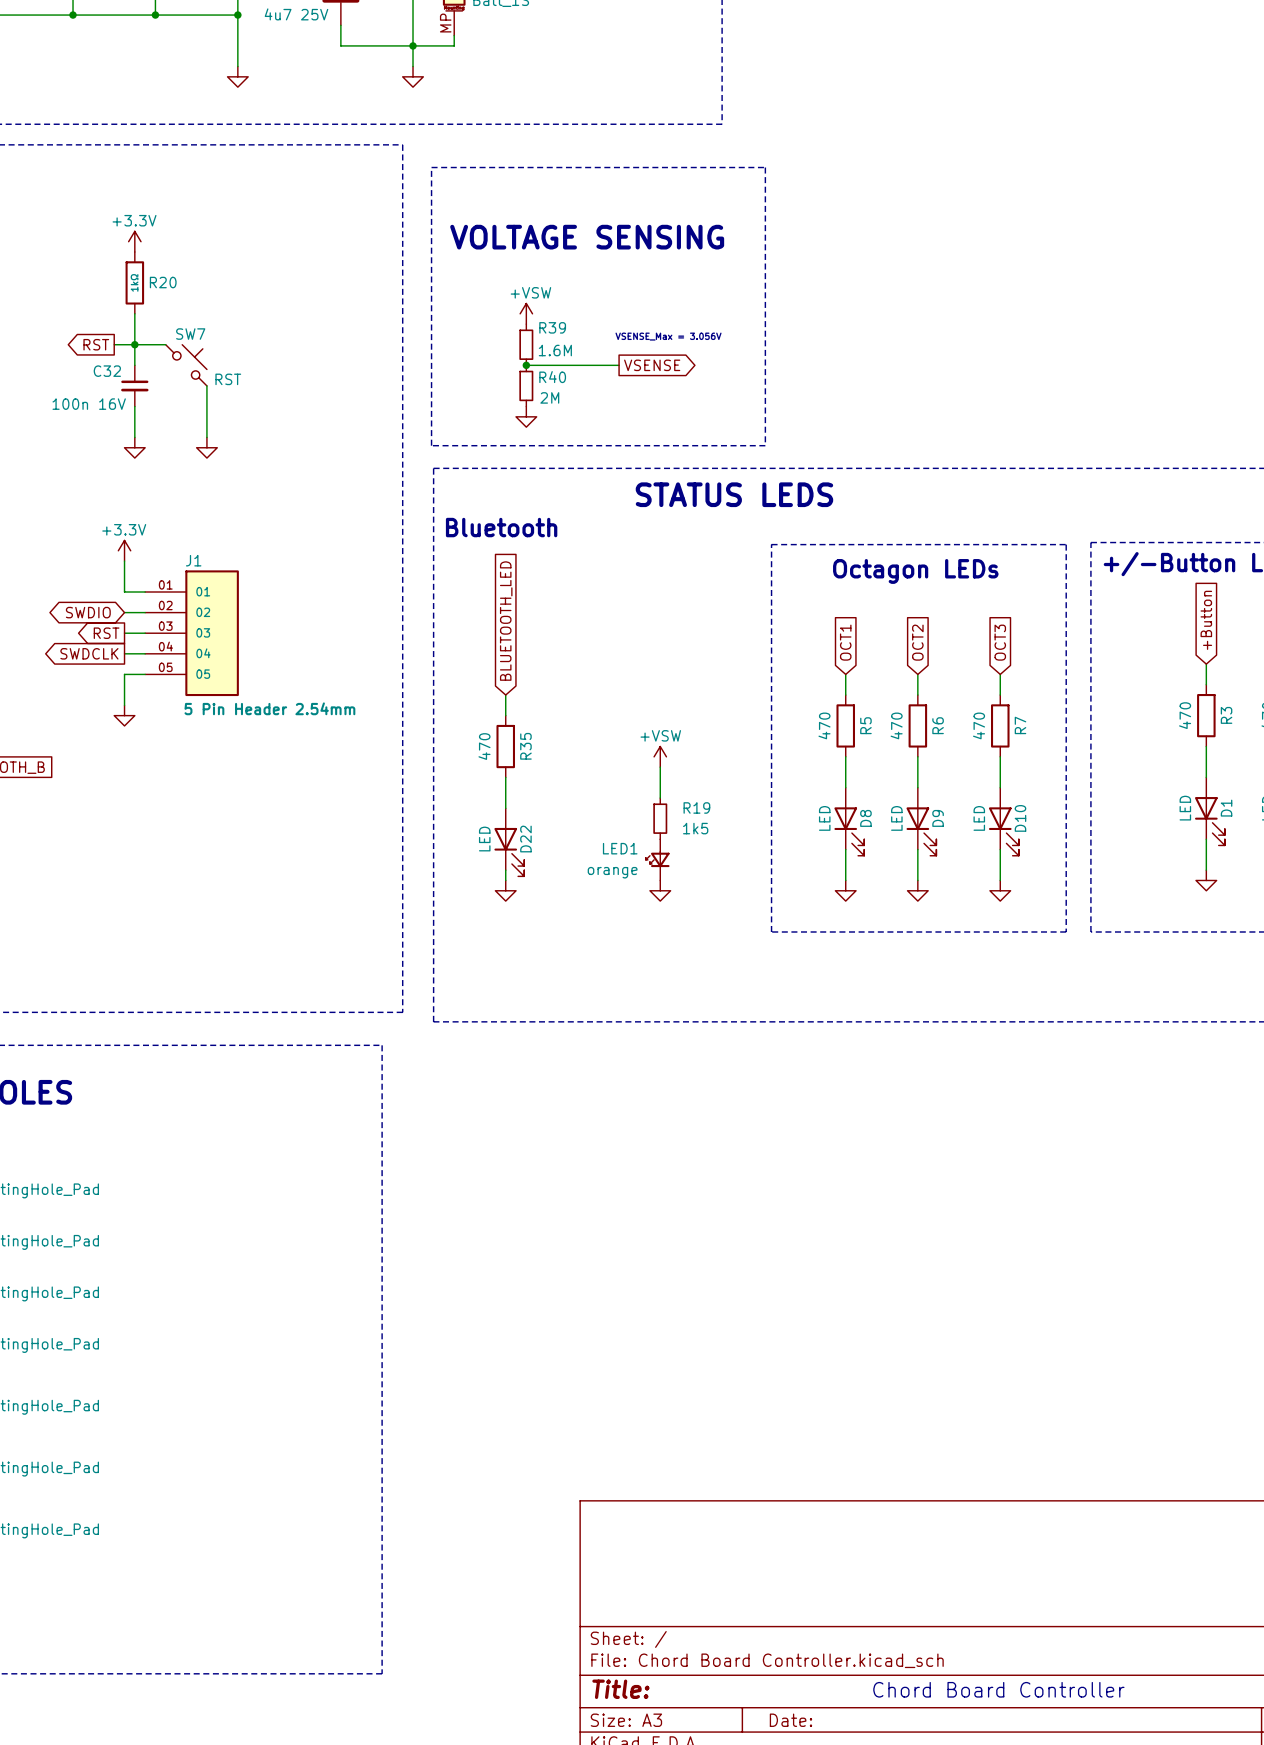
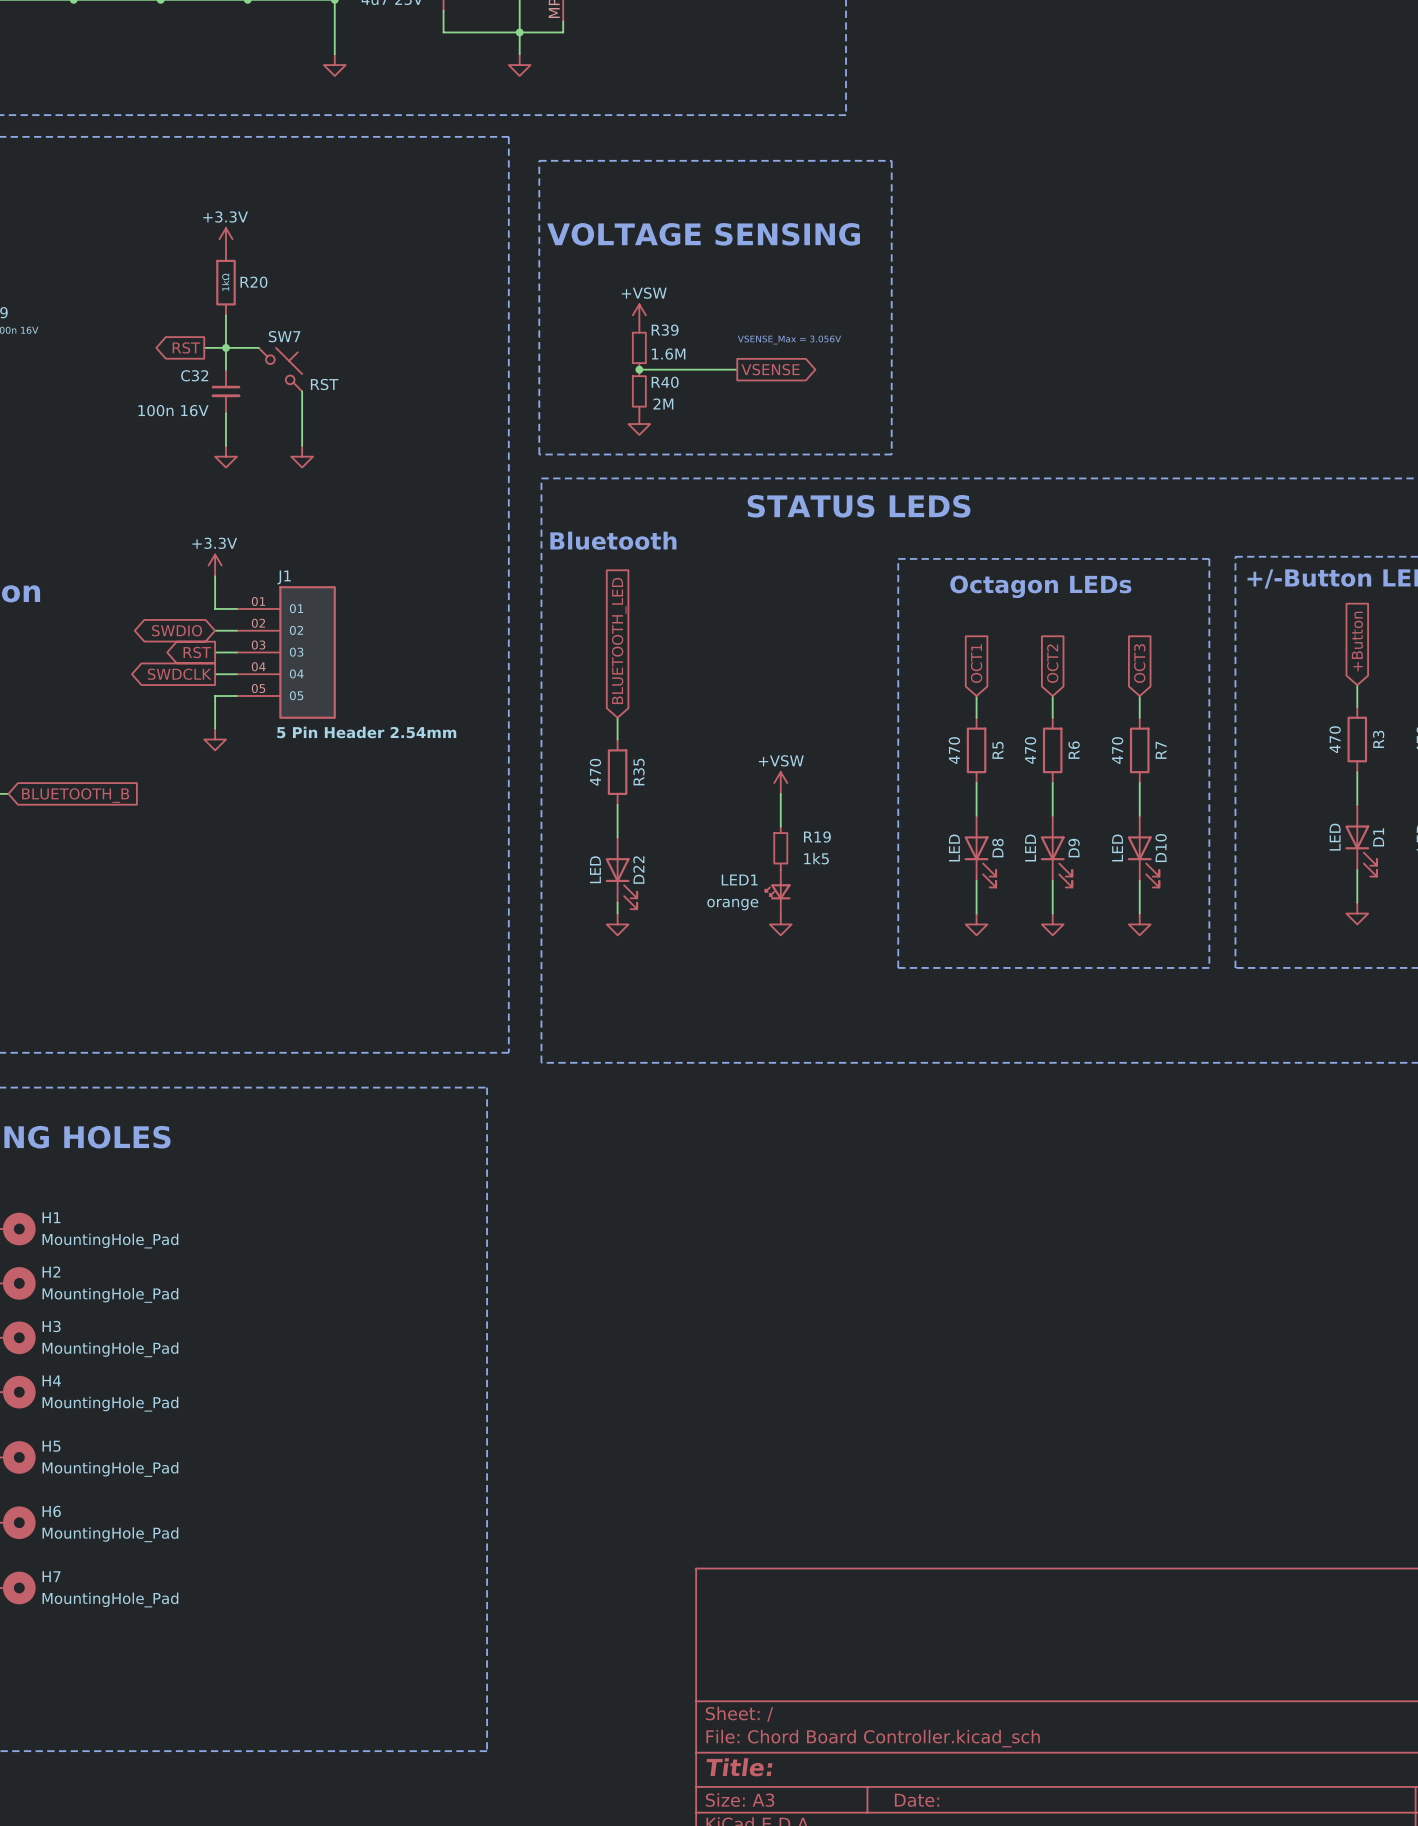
text: Chord Board Controller (998, 1689) -> none

